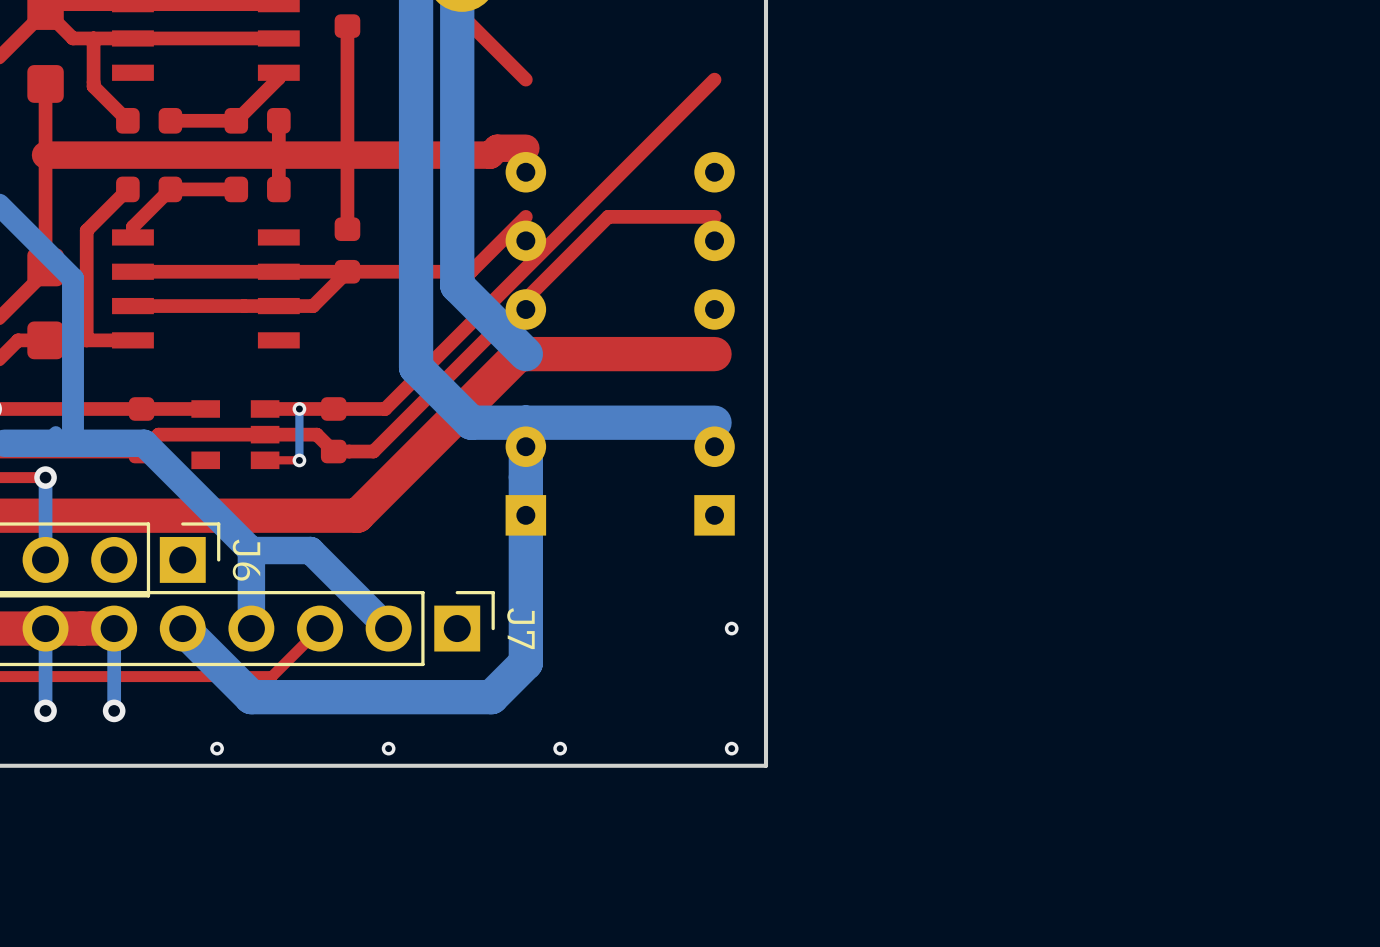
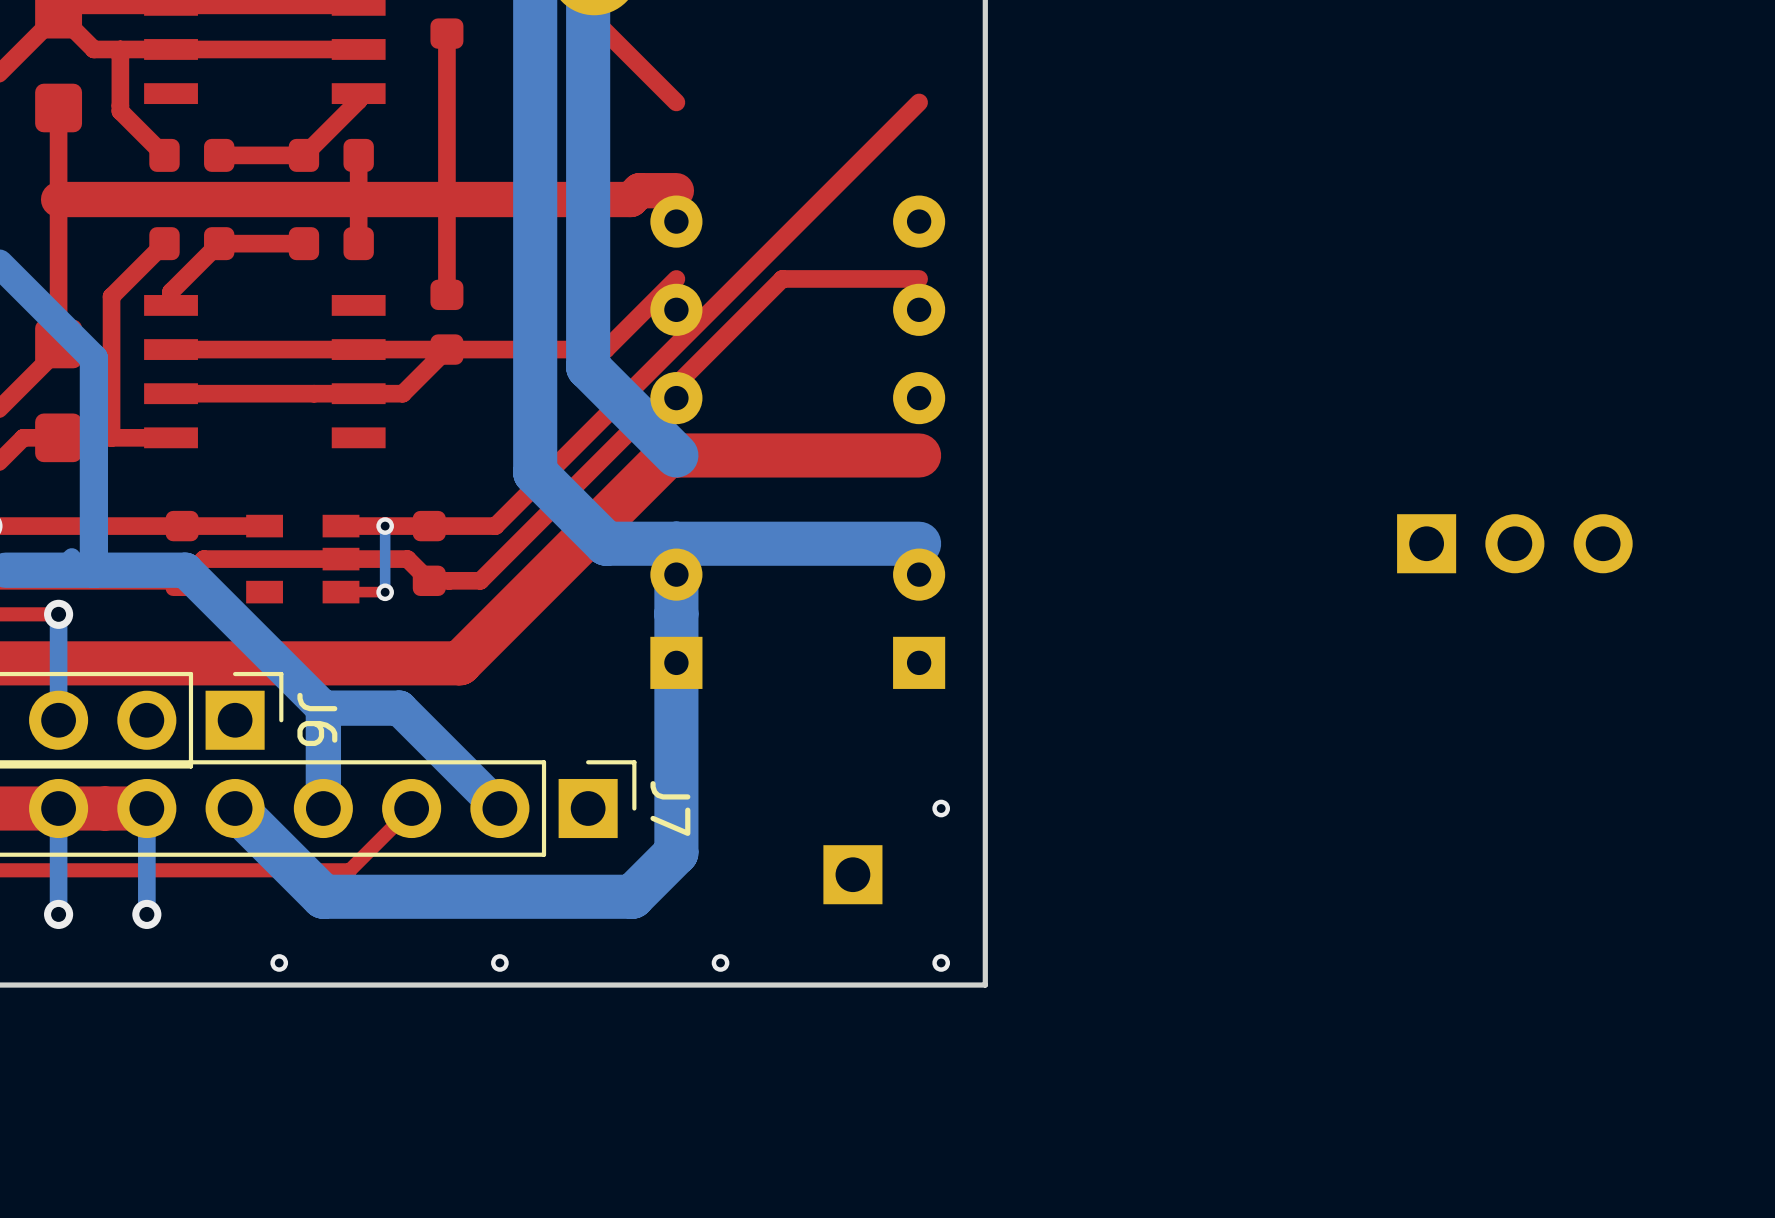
part: none -> (1514, 543)
part: none -> (852, 874)

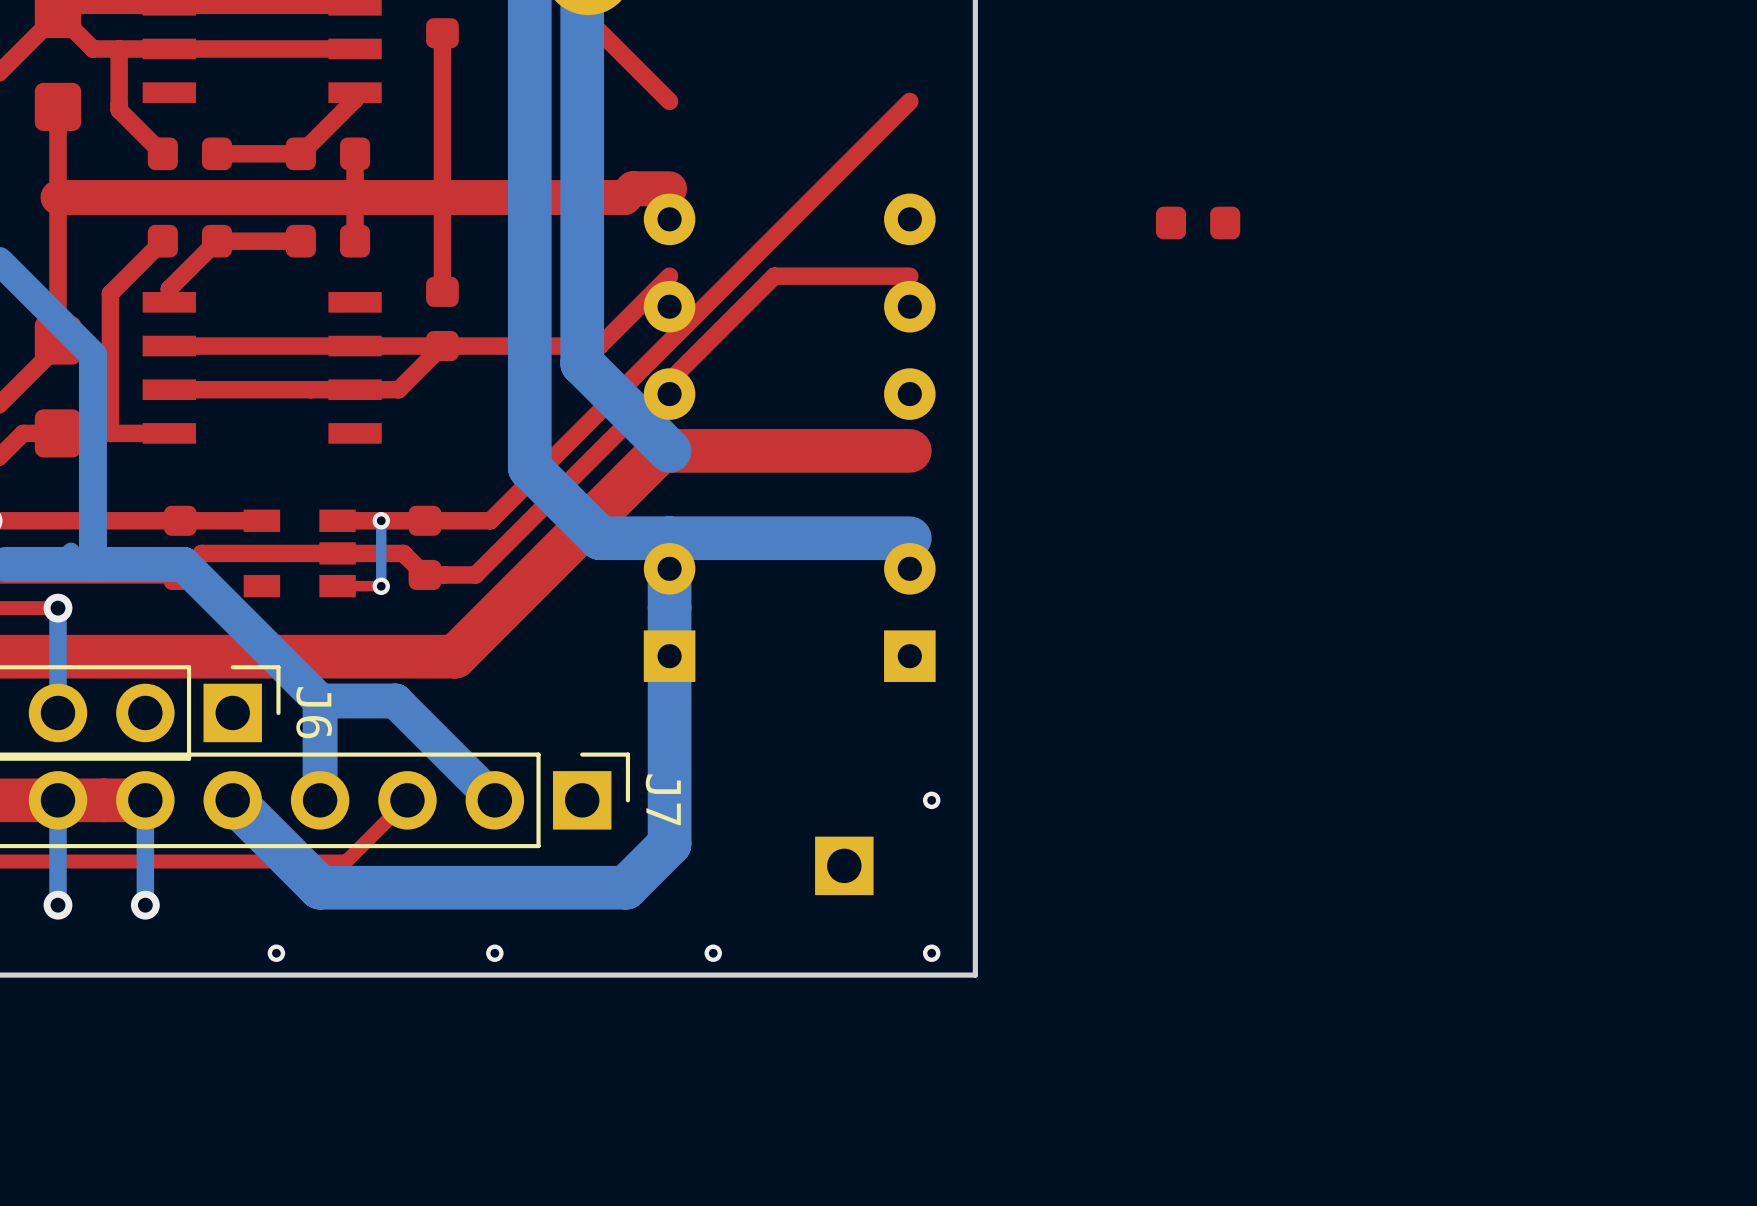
part: none -> (1198, 222)
part: (1514, 543) -> none

